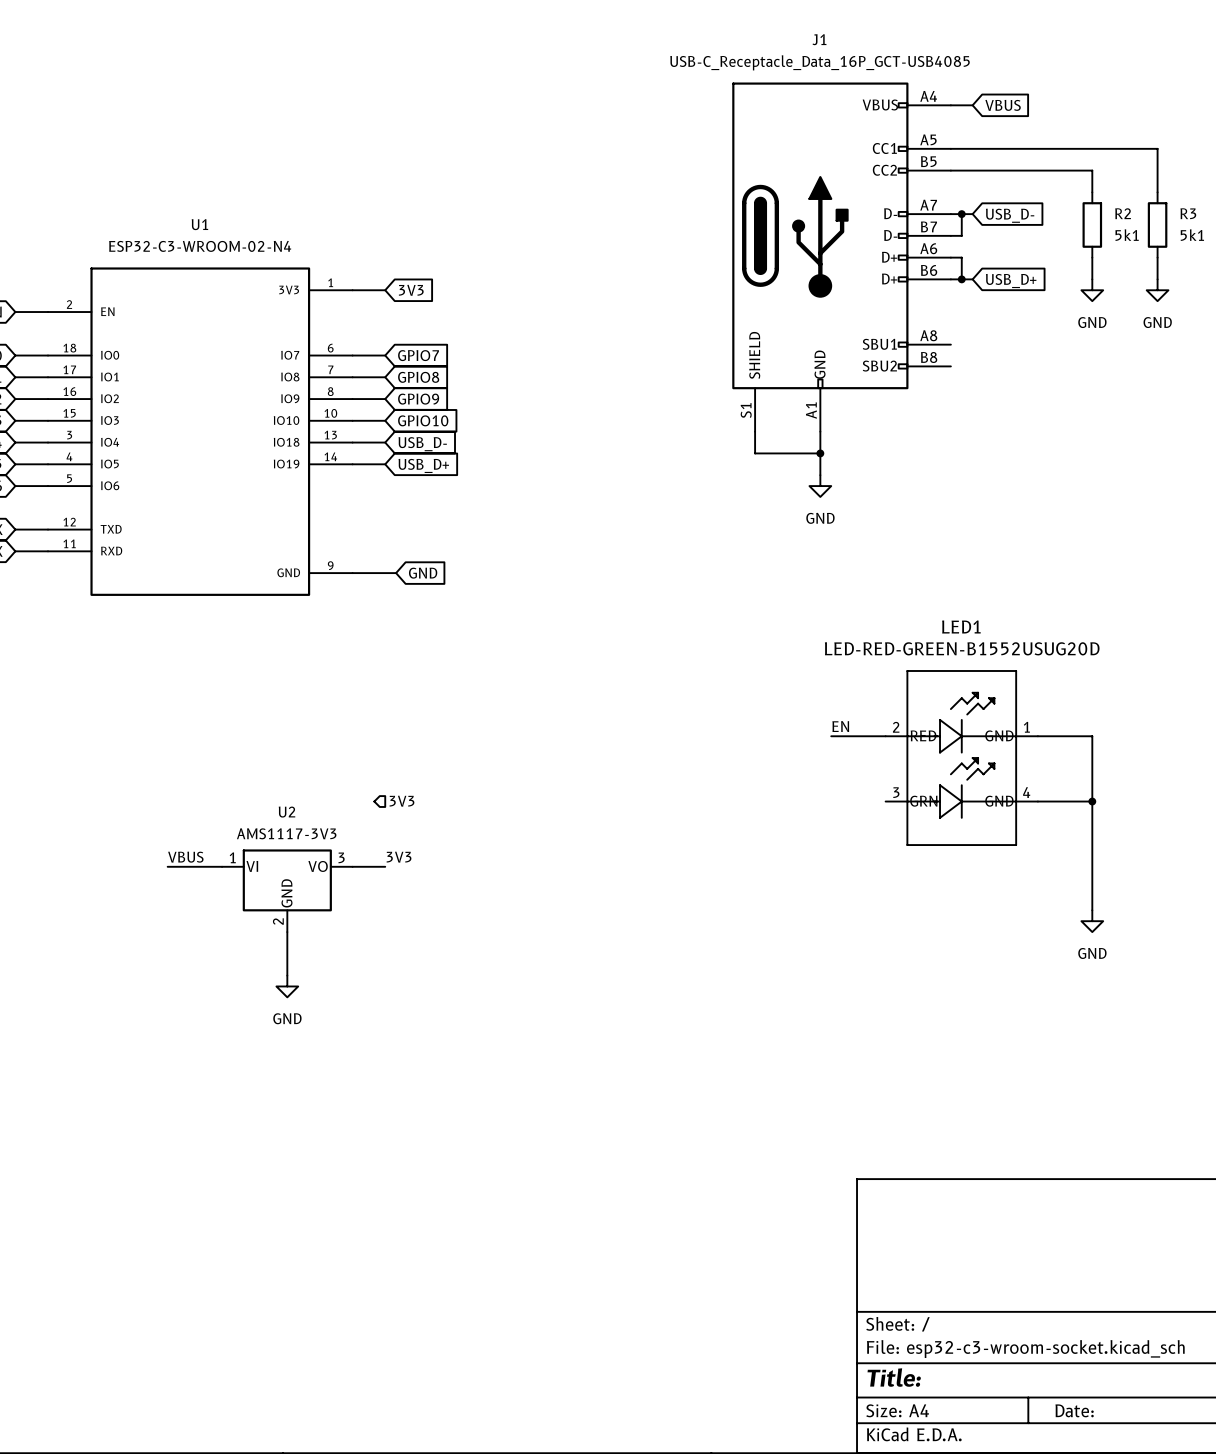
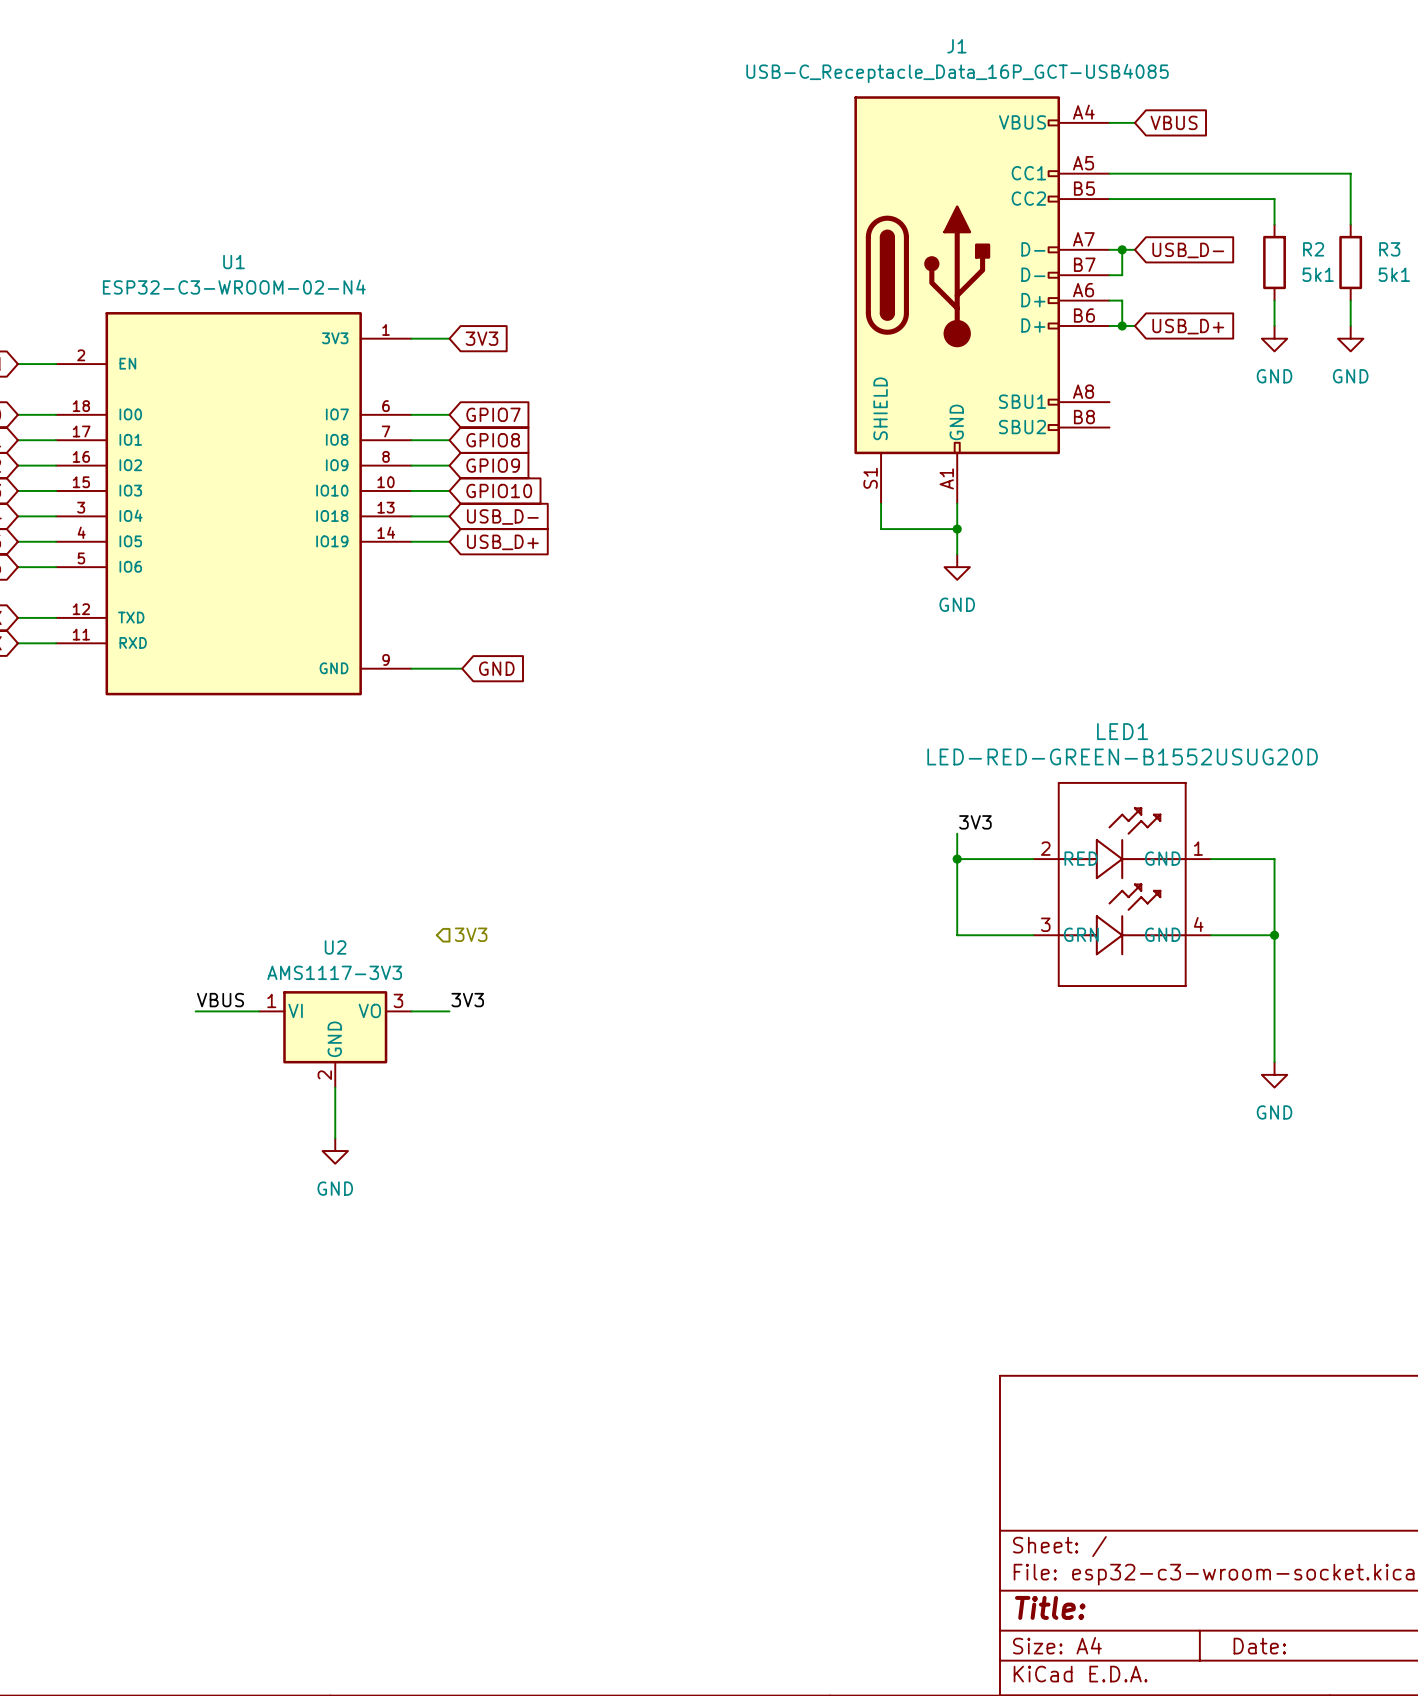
label: none -> 3V3 (975, 822)
wire: none -> (957, 833) (957, 935) (1033, 935)
label: EN (840, 726) -> none
wire: none -> (957, 859) (969, 859)
junction: none -> (957, 859)

